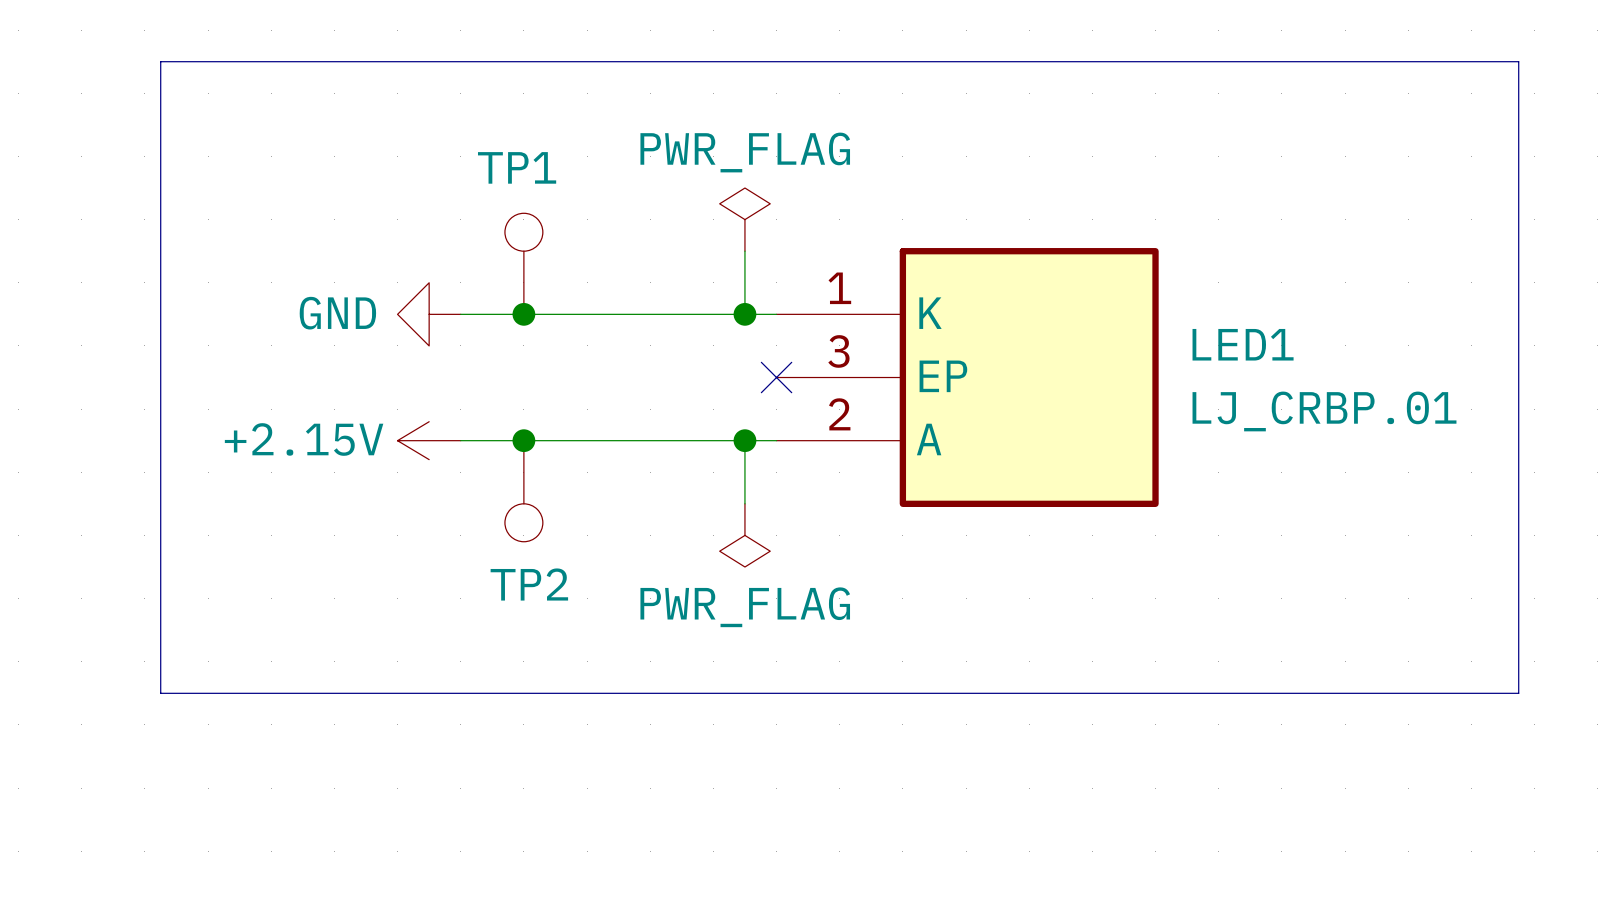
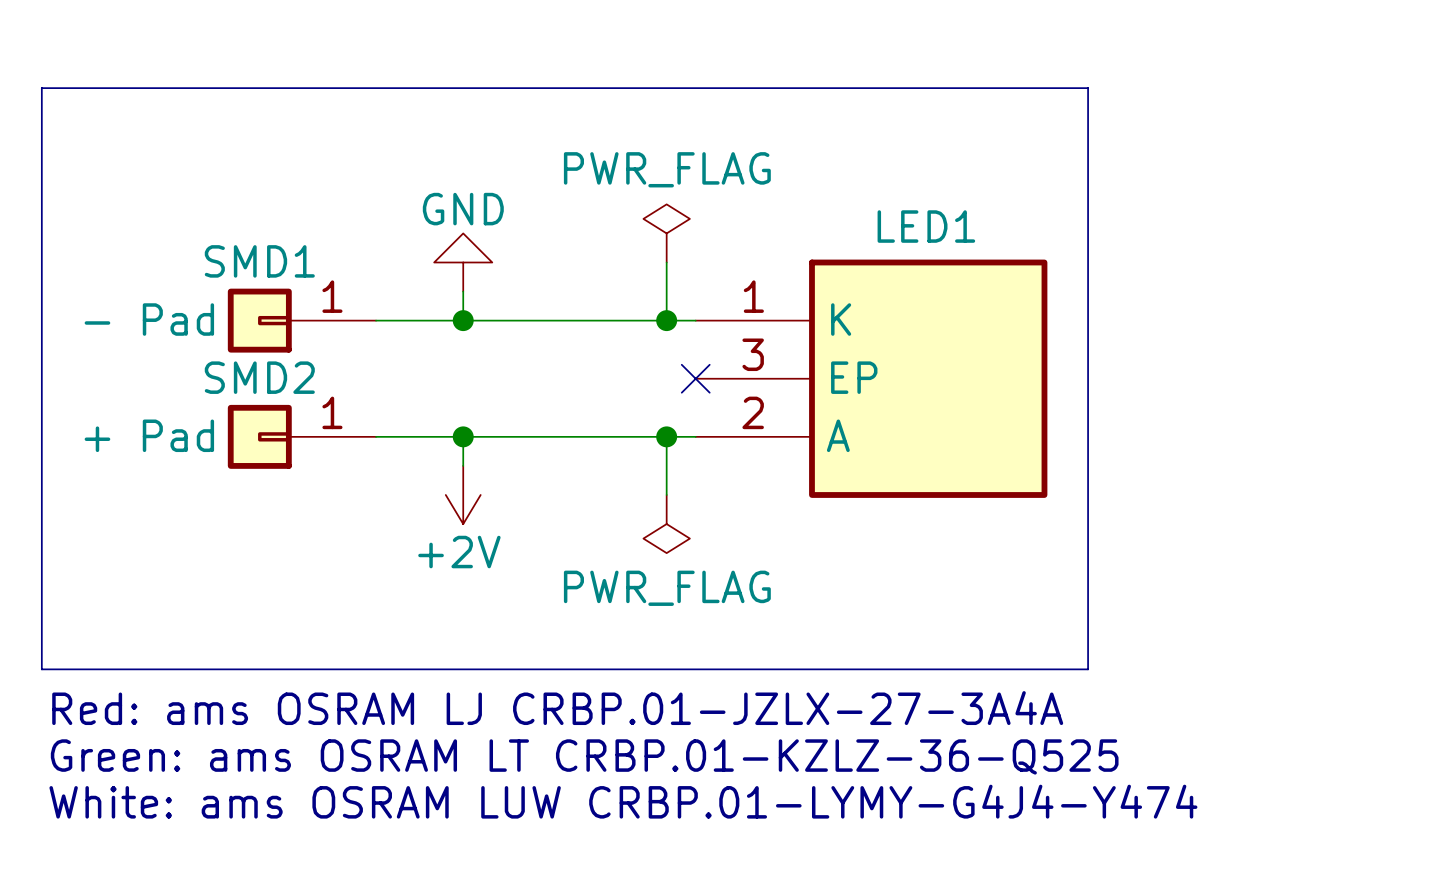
line: (160, 61) (160, 693) -> (129, 88) (41, 88) (41, 669) (129, 669)
line: (1202, 61) (1518, 61) (1518, 693) (1202, 693) -> (1088, 88) (1088, 669)
TP1: (523, 263) -> none
power symbol text position: GND (337, 313) -> GND (463, 209)
SMD1: none -> - Pad (301, 320)
power symbol rotation: 0° (429, 314) -> 90° clockwise (463, 262)
power symbol position: GND (429, 314) -> GND (463, 262)
LED1 name position: LED1 (1243, 344) -> LED1 (926, 226)
LED1 value: LJ_CRBP.01 (1324, 411) -> none
SMD2: none -> + Pad (301, 436)
power symbol: +2.15V (429, 440) -> none
TP2: (523, 491) -> none
power symbol: none -> +2V (463, 494)
text: none -> Red: ams OSRAM LJ CRBP.01-JZLX-27-3A4A (557, 708)
text: none -> Green: ams OSRAM LT CRBP.01-KZLZ-36-Q525 (584, 756)
text: none -> White: ams OSRAM LUW CRBP.01-LYMY-G4J4-Y474 (623, 801)

